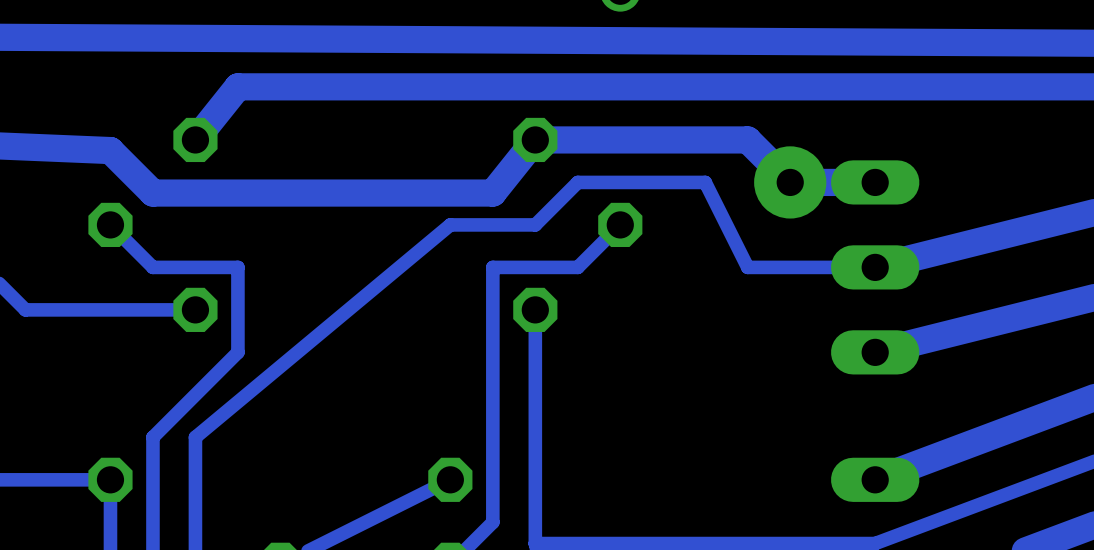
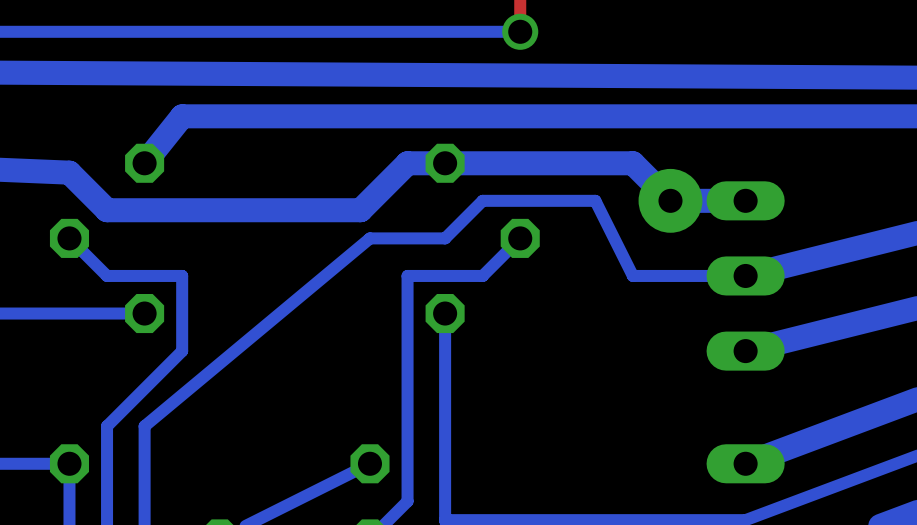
bottom track: (535, 139) (492, 193) (439, 193) -> (445, 163) (407, 163) (360, 210)

